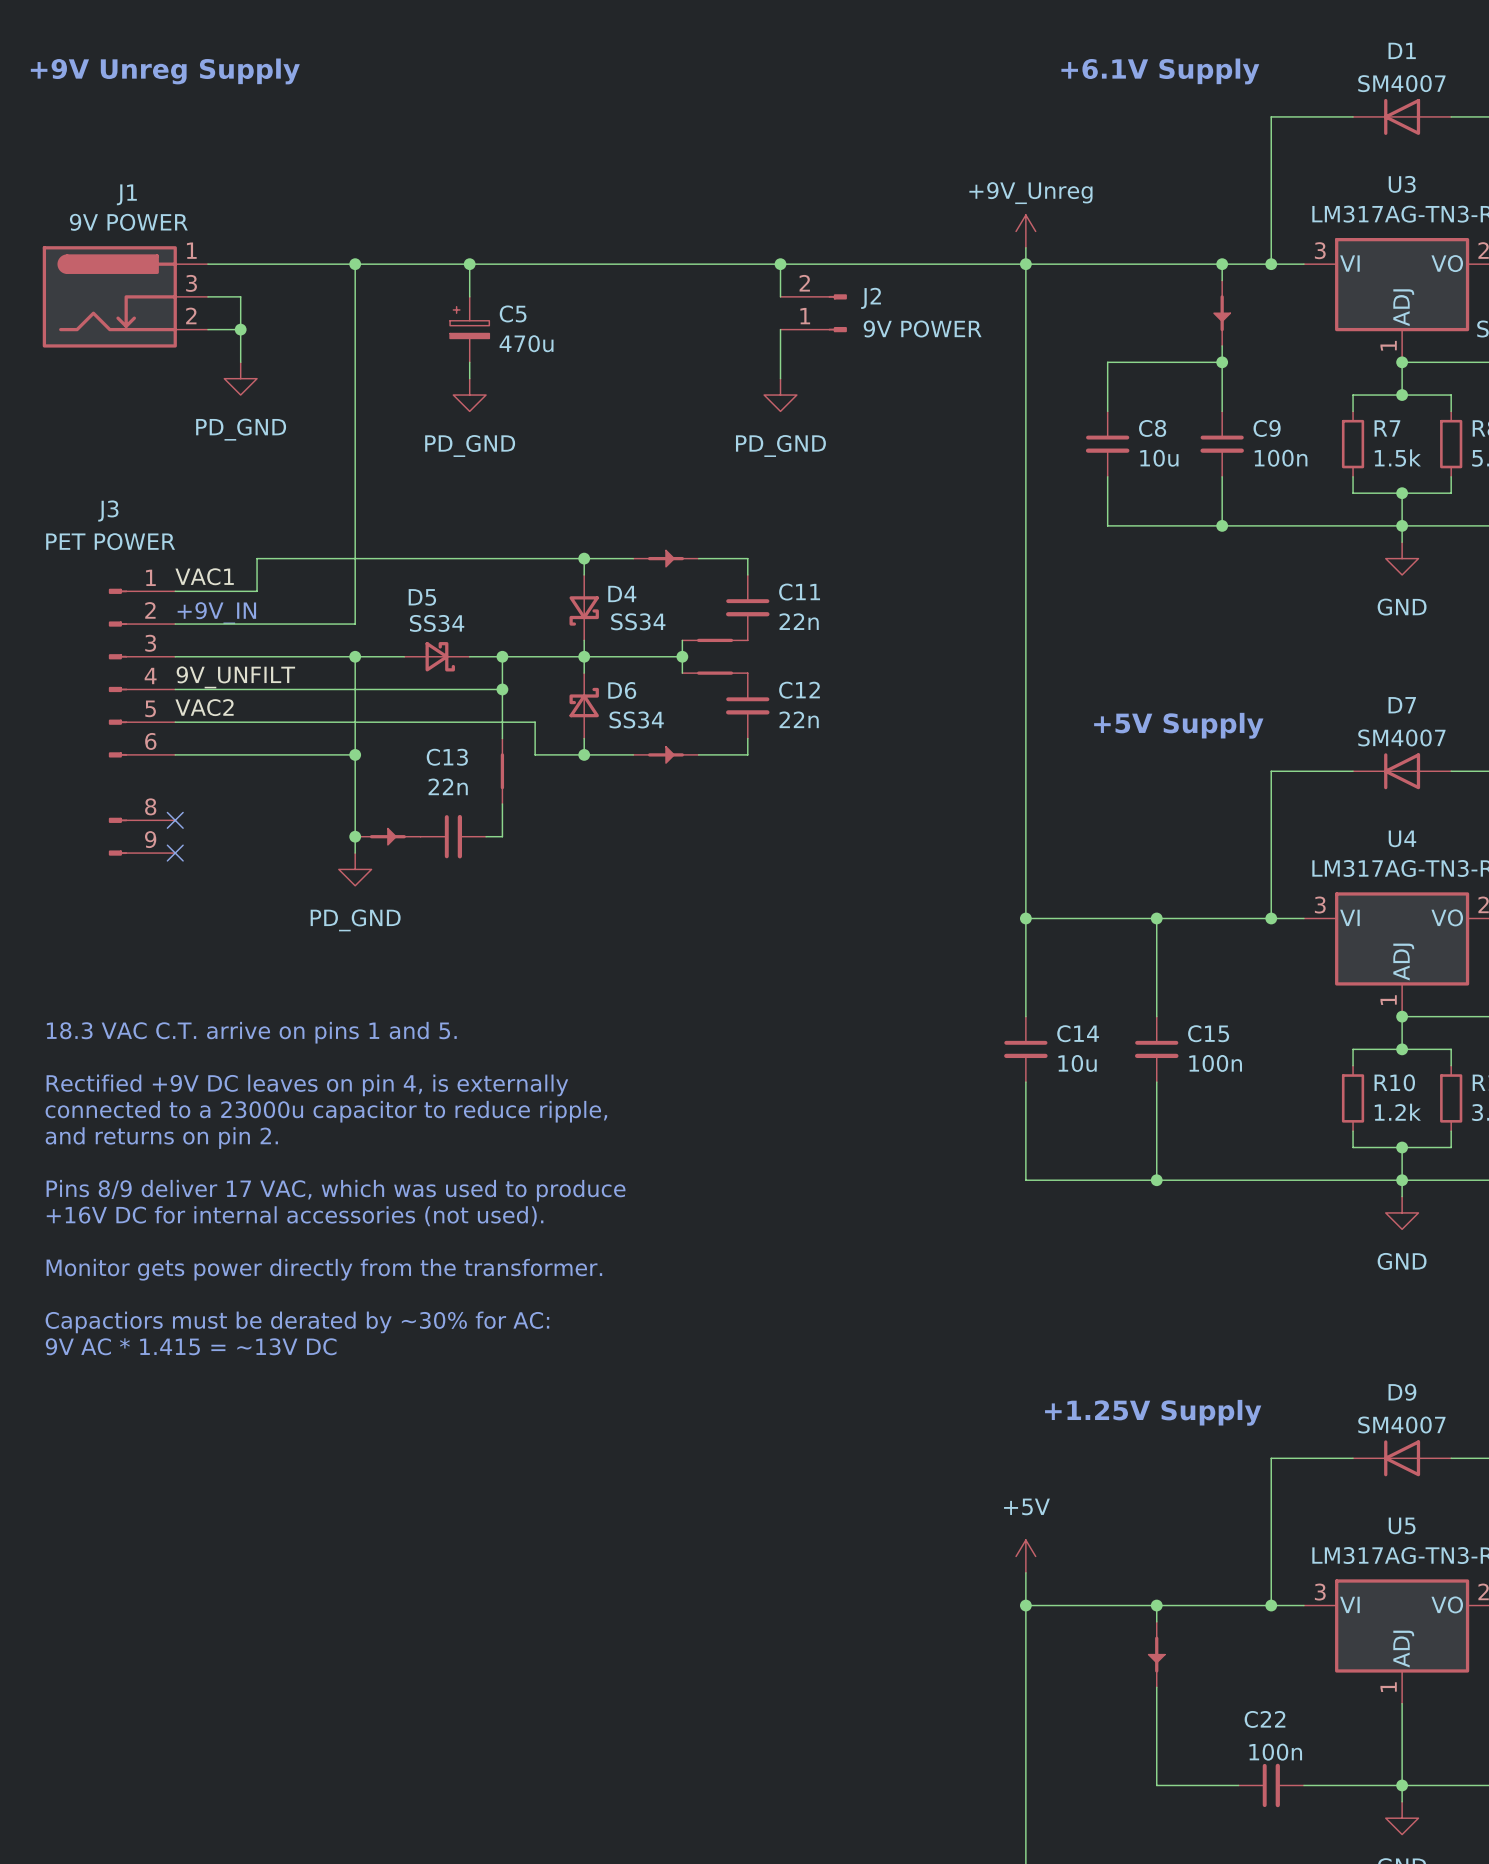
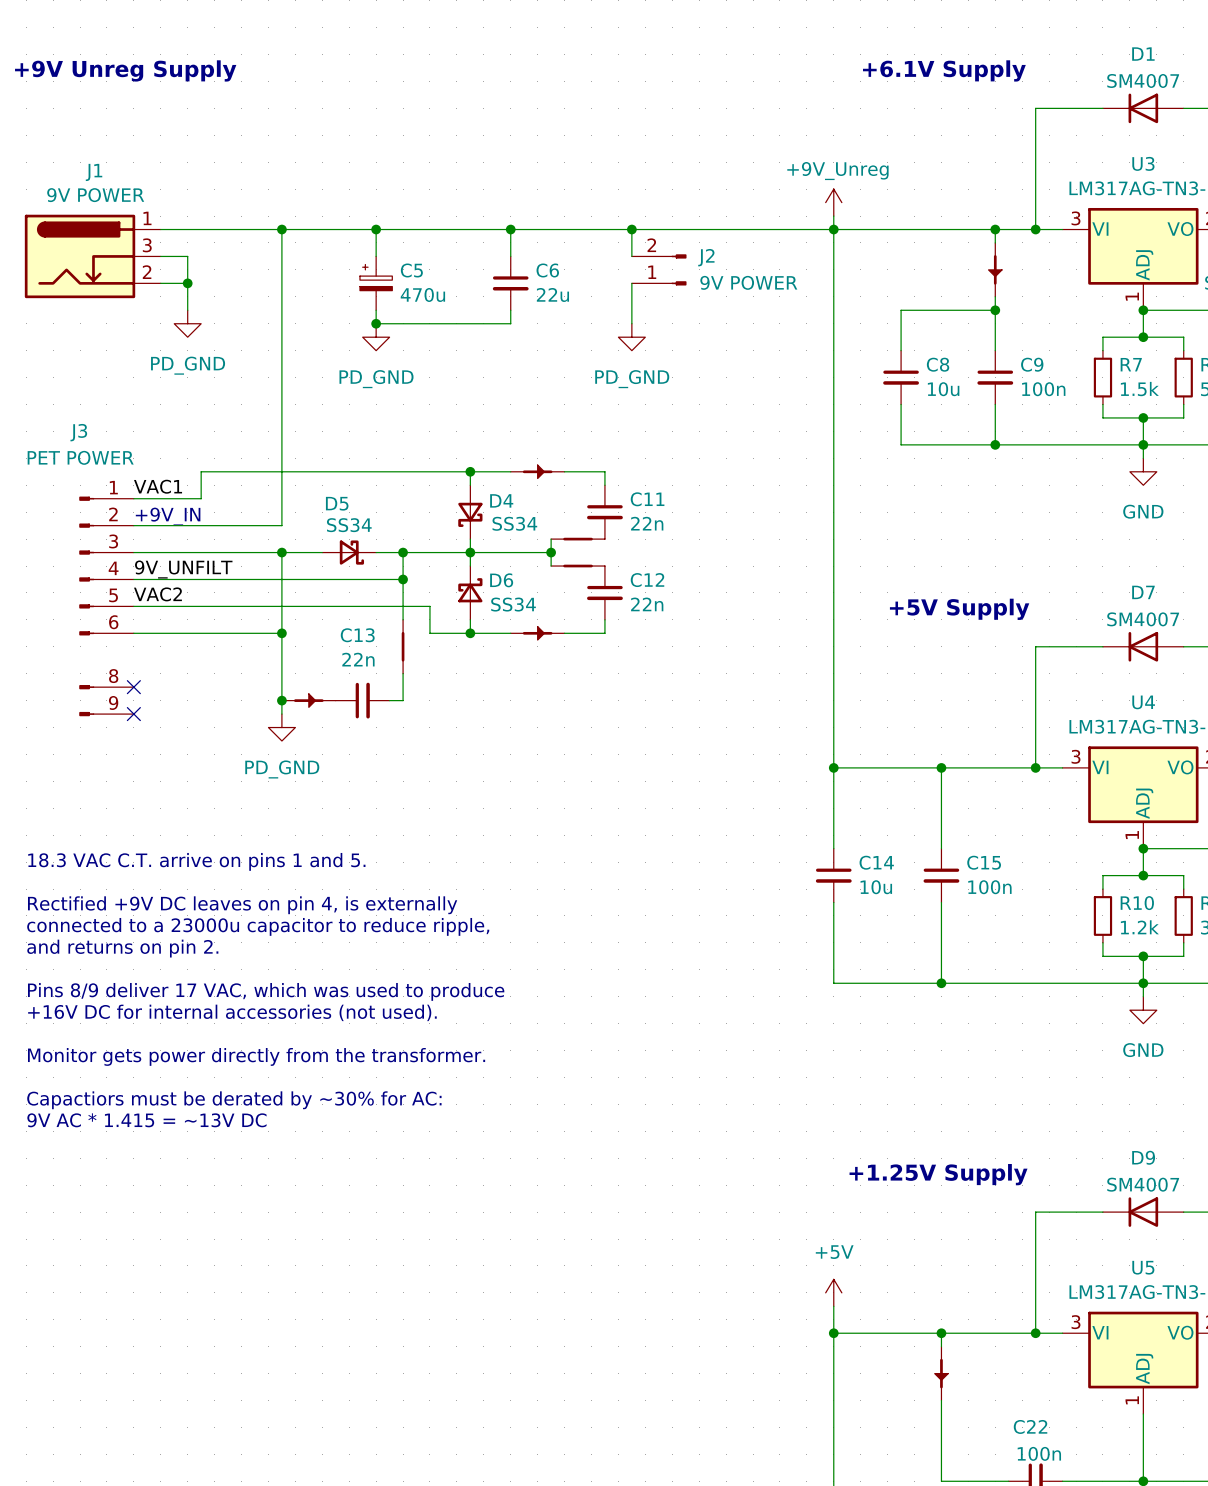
wire: none -> (510, 229) (510, 256)
junction: none -> (510, 229)
C6: none -> 22u (510, 283)
wire: none -> (510, 310) (510, 323) (376, 323)
junction: none -> (376, 323)

